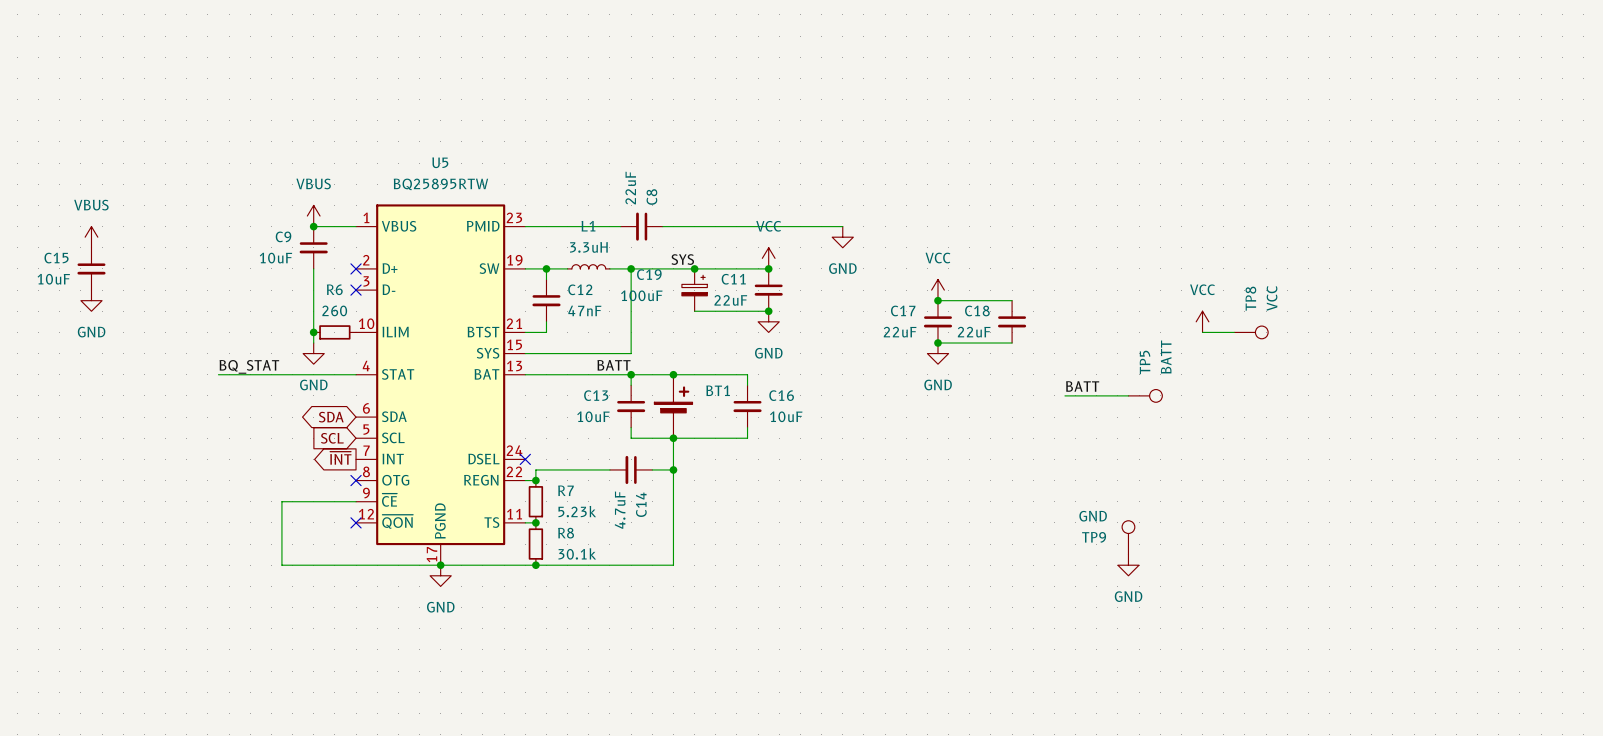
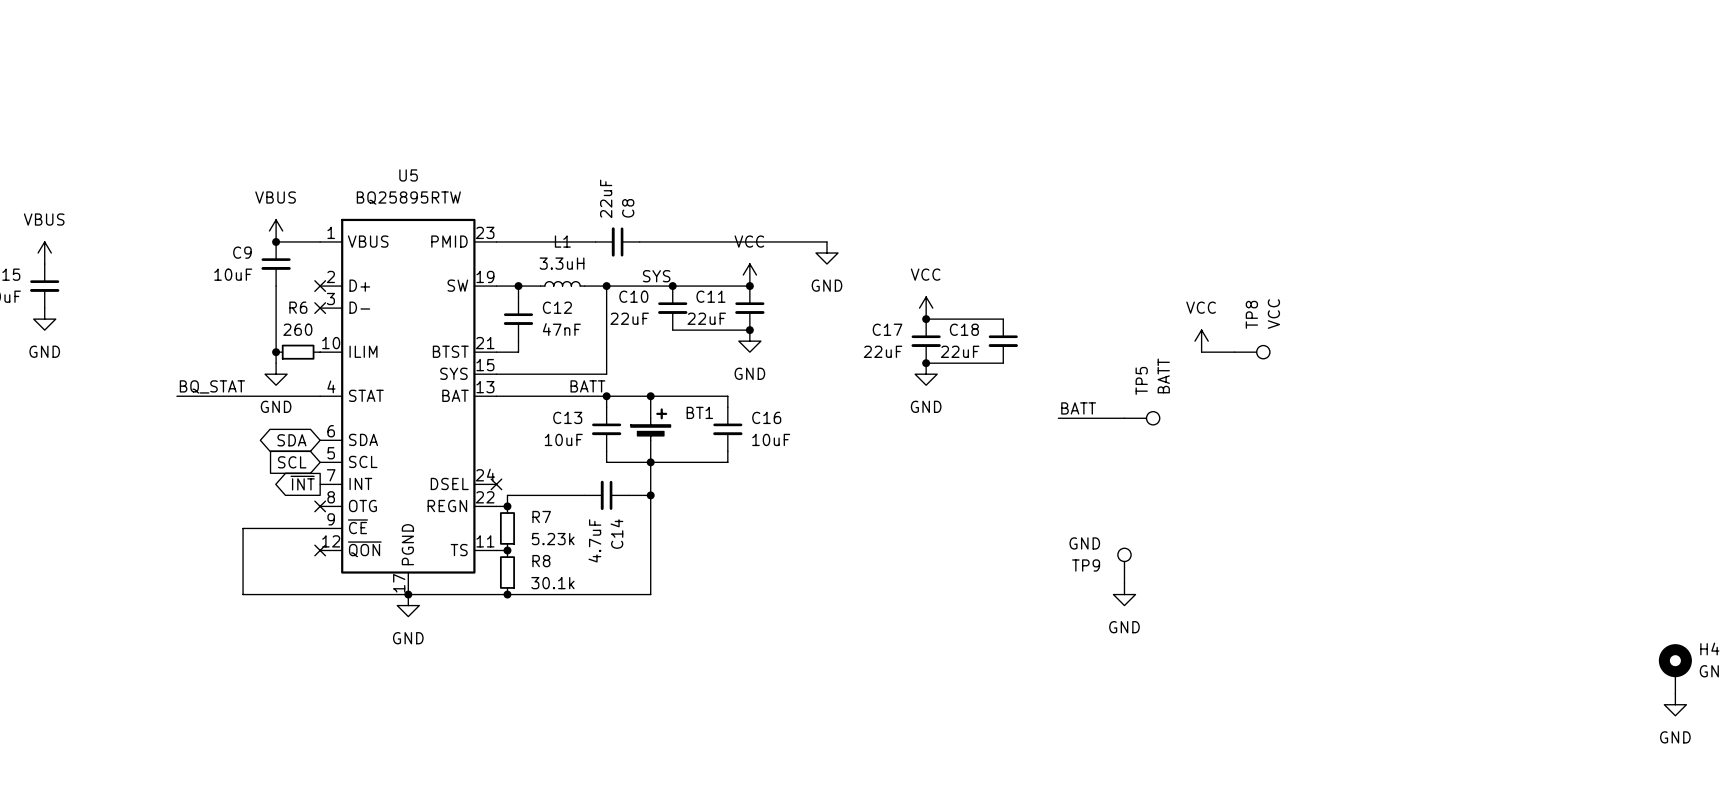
C19: 100uF (694, 290) -> none
C10: none -> 22uF (672, 308)

